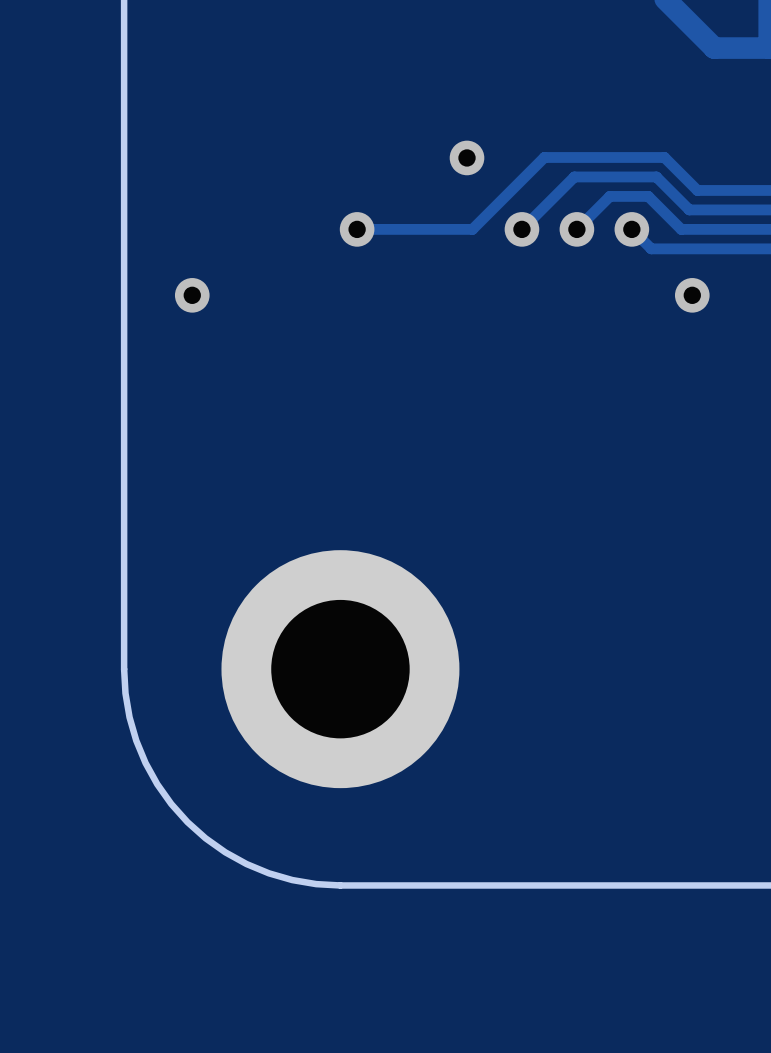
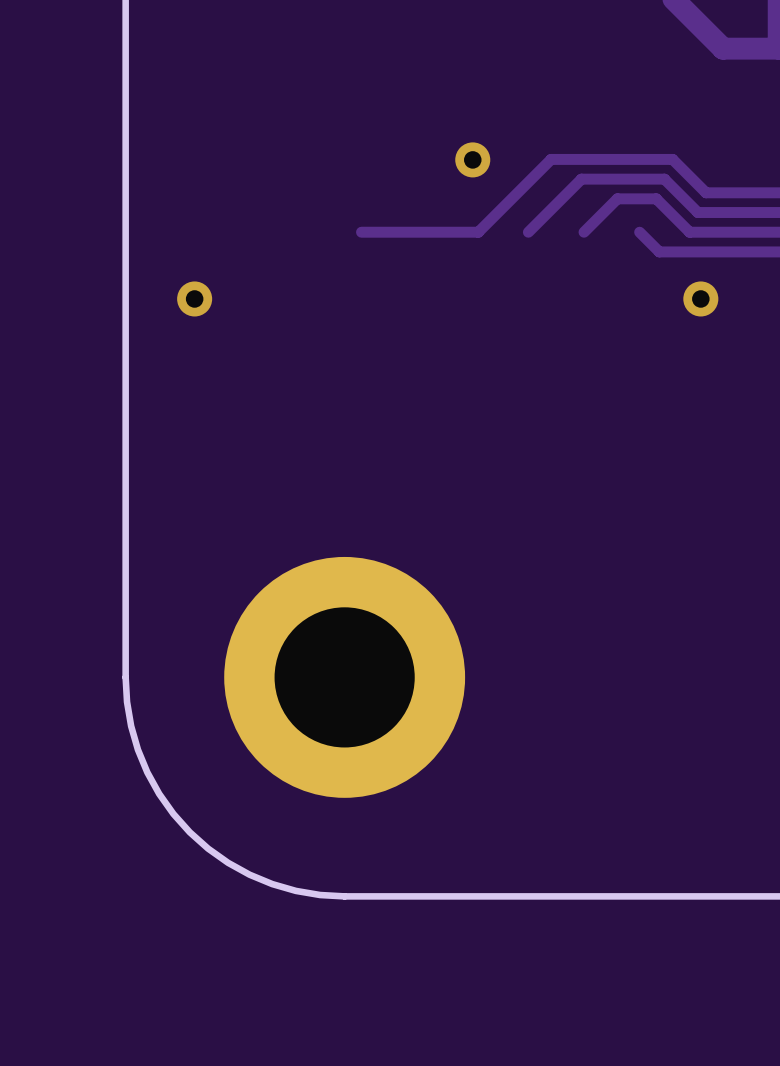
via: (357, 229) -> none
via: (521, 229) -> none
via: (576, 229) -> none
via: (631, 229) -> none

